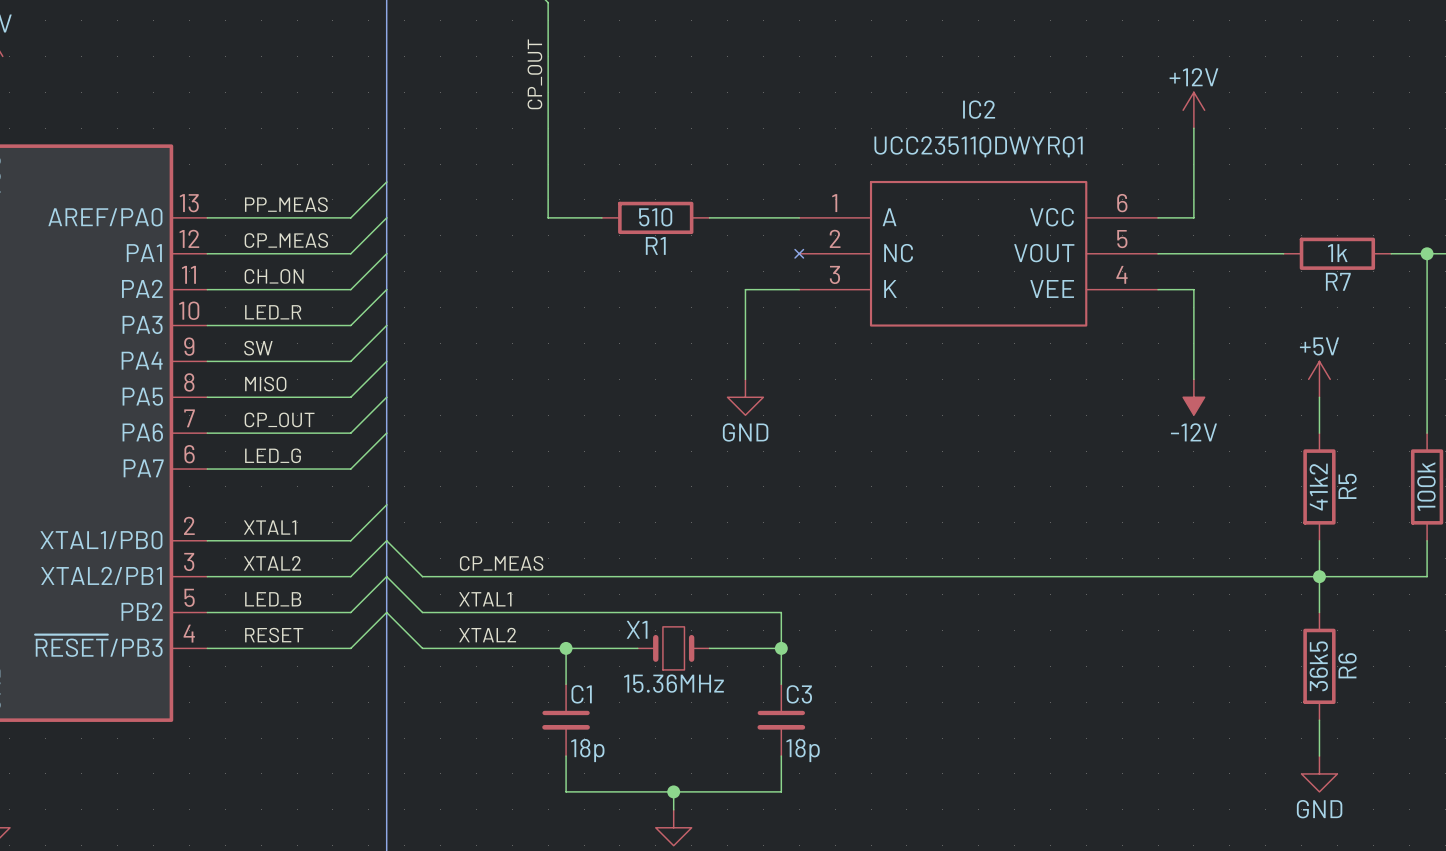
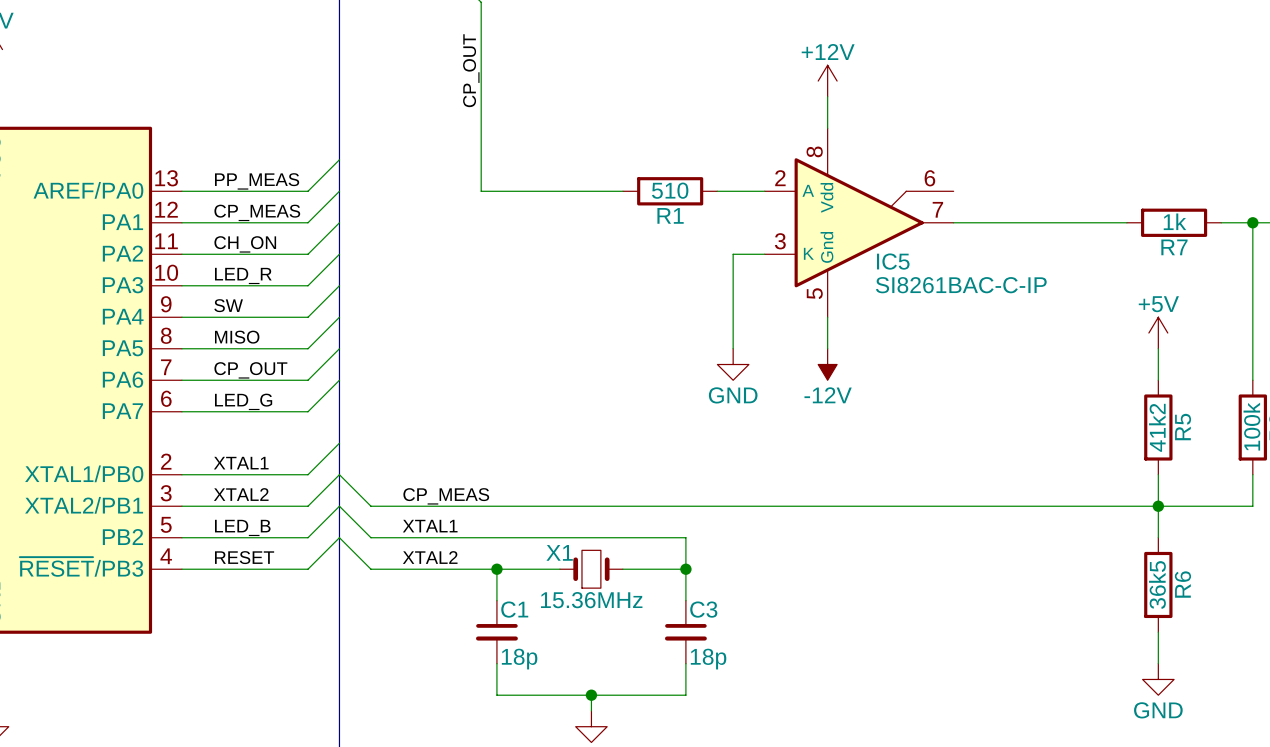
wire: none -> (827, 96) (827, 128)
power symbol position: +12V (1193, 110) -> +12V (827, 81)
wire: (1193, 128) (1193, 217) (1158, 217) -> none
R1 position: (655, 217) -> (670, 191)
wire: (709, 217) (799, 217) -> (622, 191) (528, 191)
IC2: UCC23511QDWYRQ1 (976, 253) -> none
IC5: none -> SI8261BAC-C-IP (859, 222)
wire: (799, 289) (745, 289) (745, 379) -> none
wire: none -> (764, 254) (733, 254) (733, 348)
wire: (1158, 289) (1193, 289) (1193, 379) -> none
wire: none -> (827, 317) (827, 348)
power symbol position: GND (745, 397) -> GND (733, 364)
power symbol position: -12V (1193, 397) -> -12V (827, 364)

